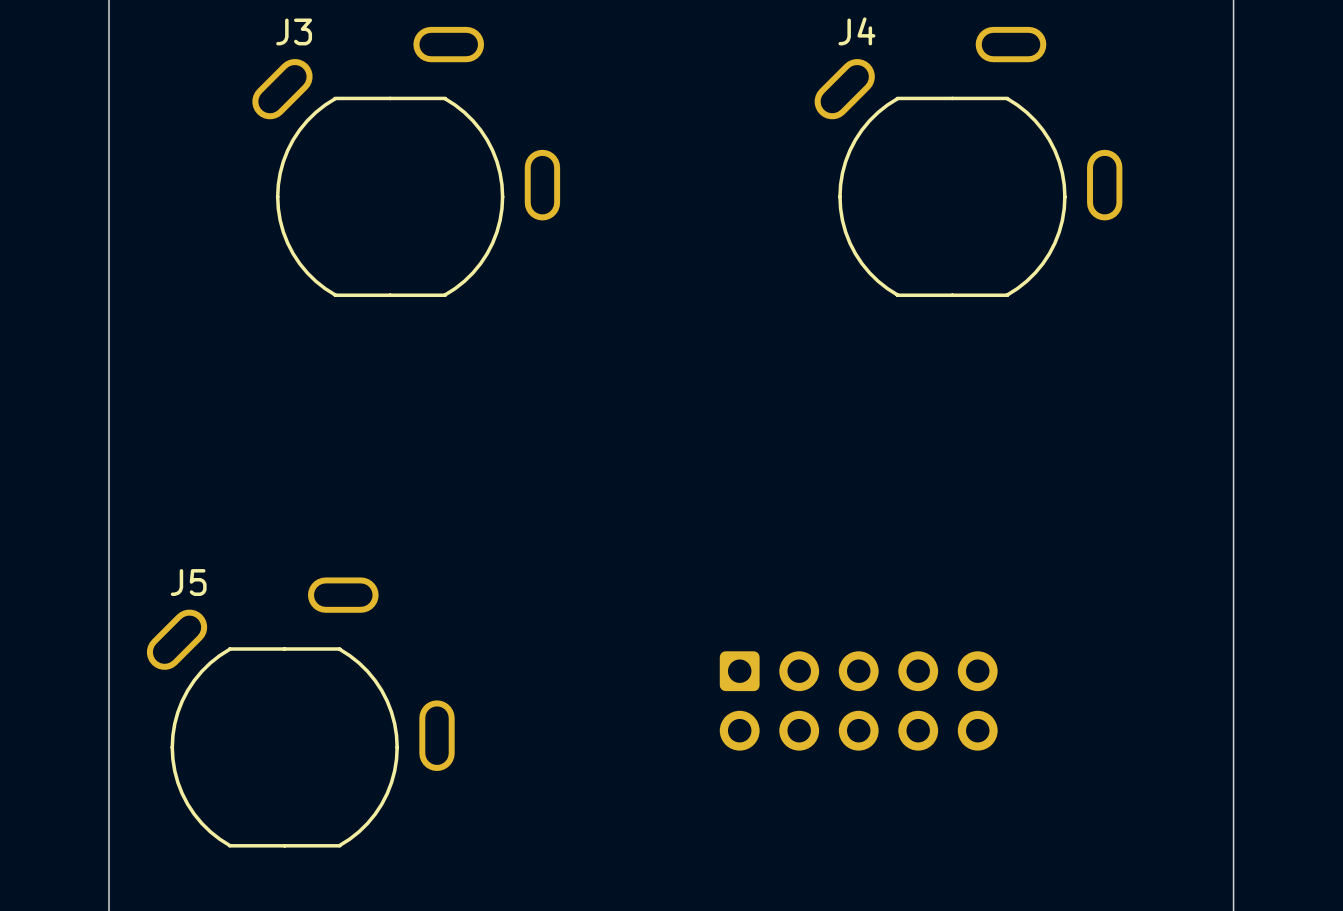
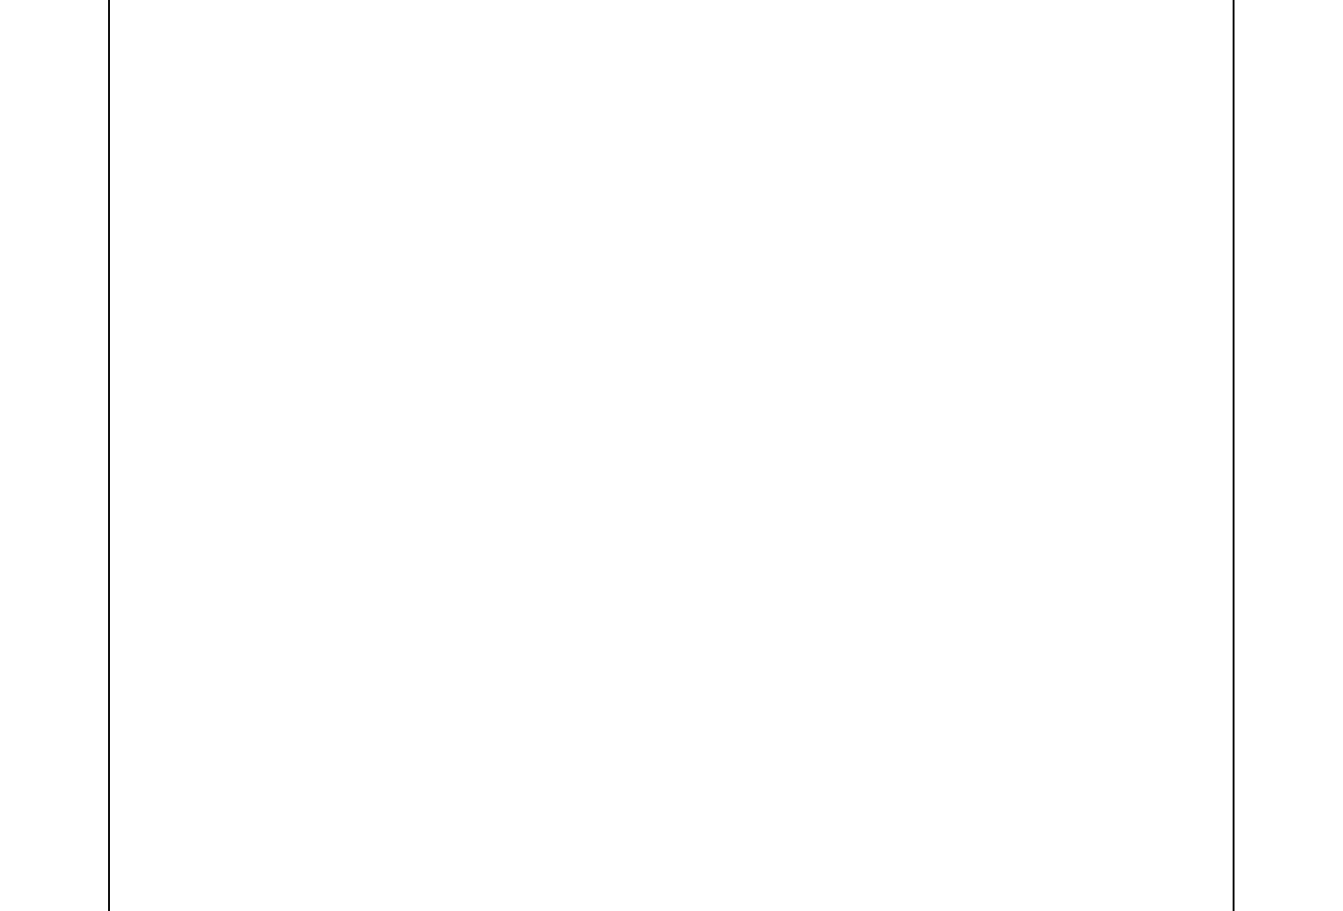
J3: (406, 161) -> none
J4: (968, 161) -> none
part: (858, 700) -> none
J5: (300, 712) -> none

